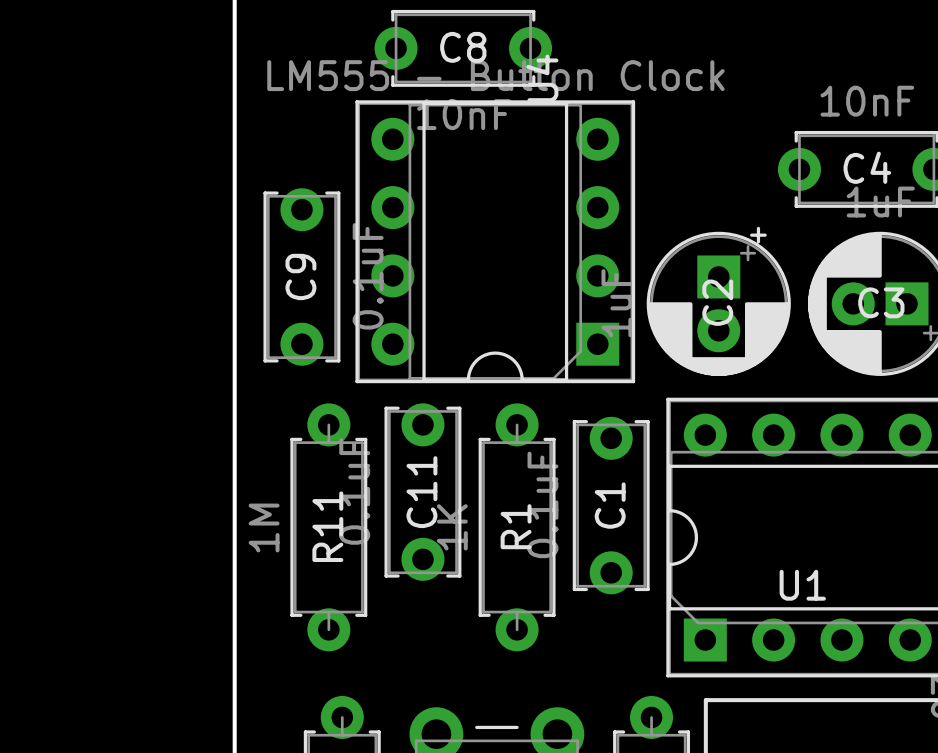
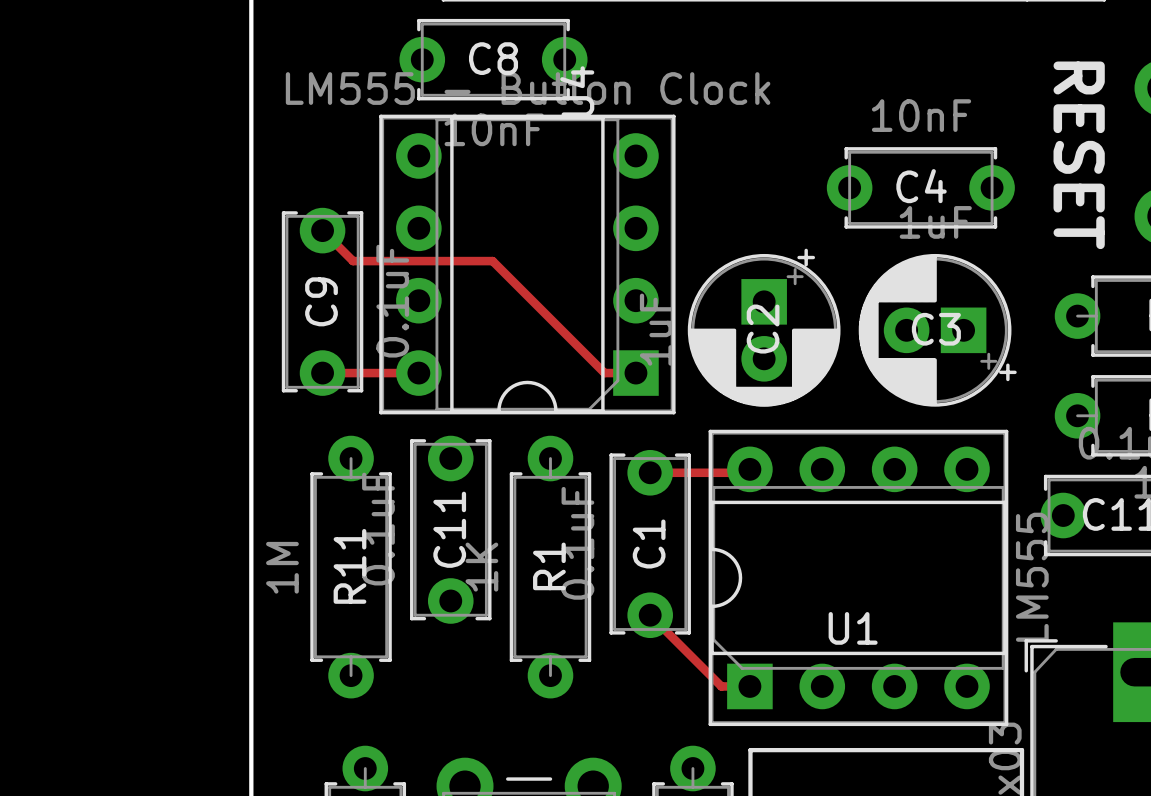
top track: none -> (322, 230) (353, 261) (492, 261) (604, 373) (635, 373)
top track: none -> (322, 373) (418, 373)
top track: none -> (749, 469) (746, 472) (650, 472)
top track: none -> (650, 615) (721, 686) (749, 686)

